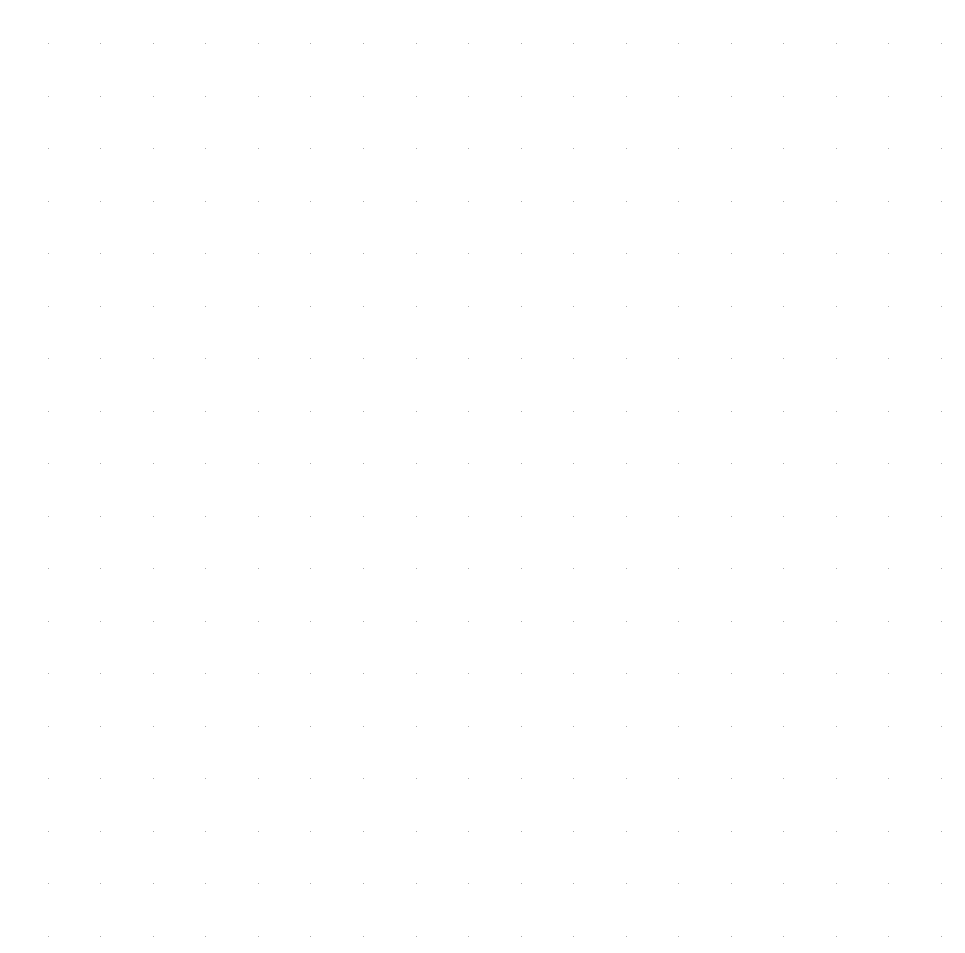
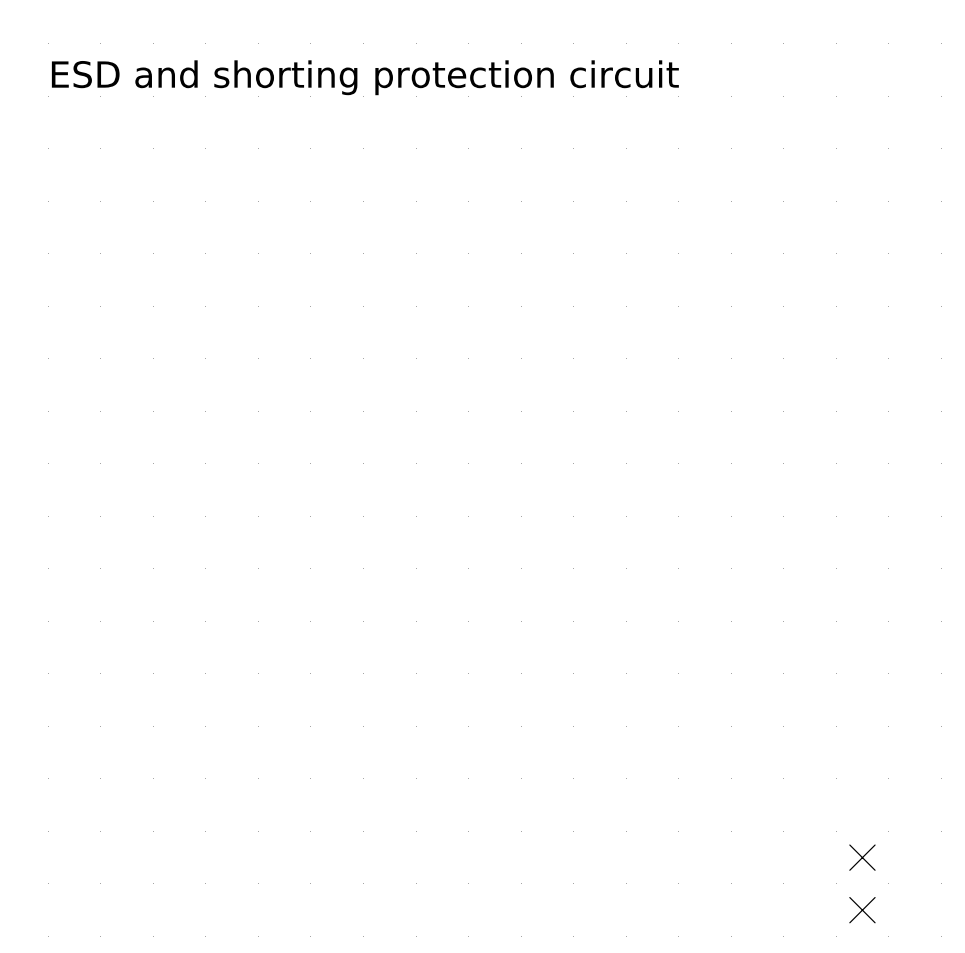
text: none -> ESD and shorting protection circuit (365, 77)
no-connect mark: none -> (862, 857)
no-connect mark: none -> (862, 910)

